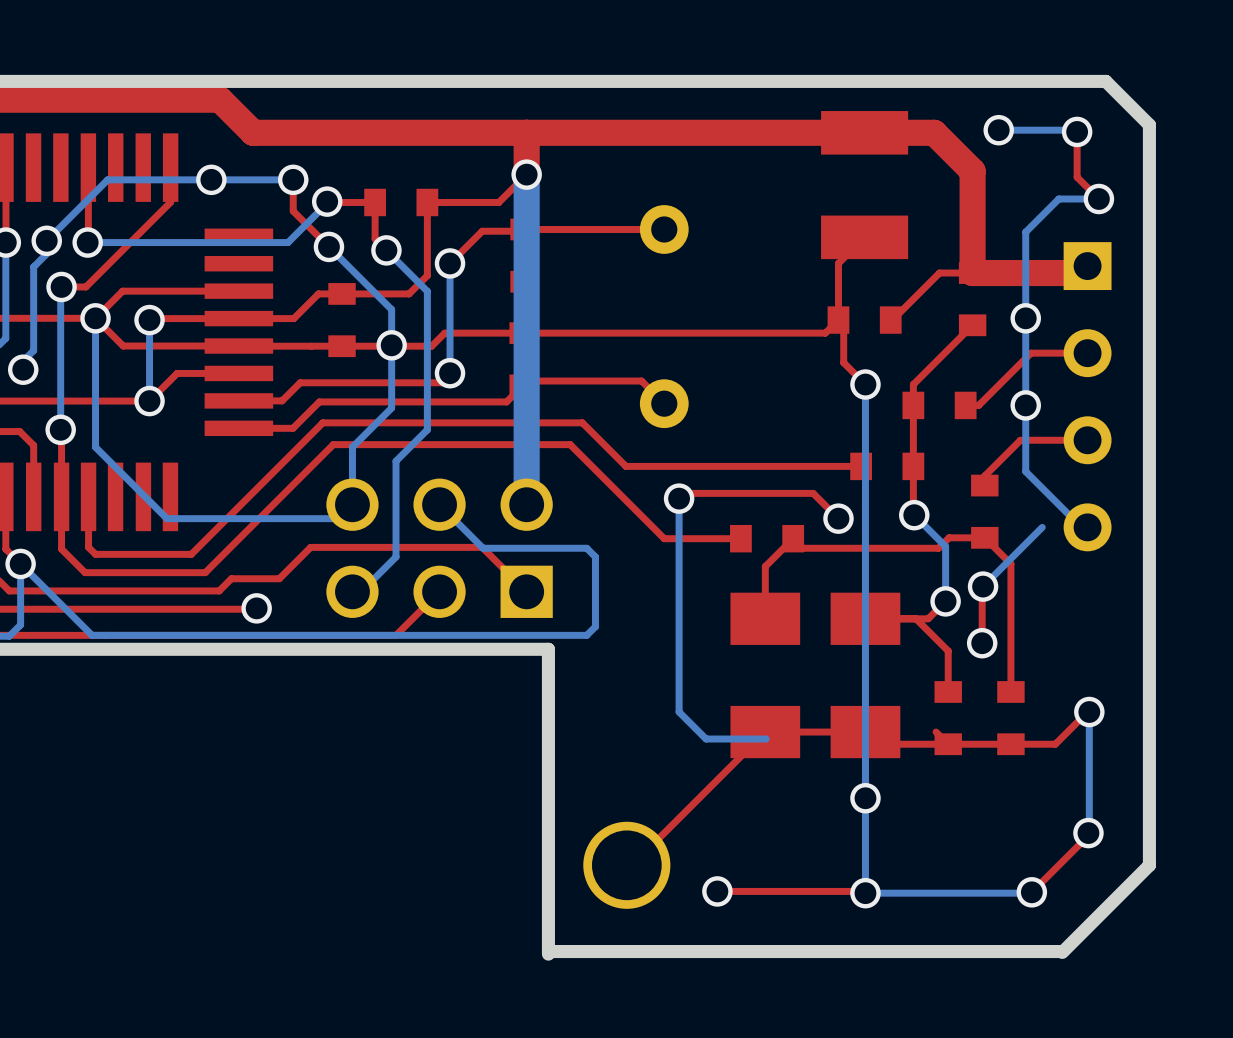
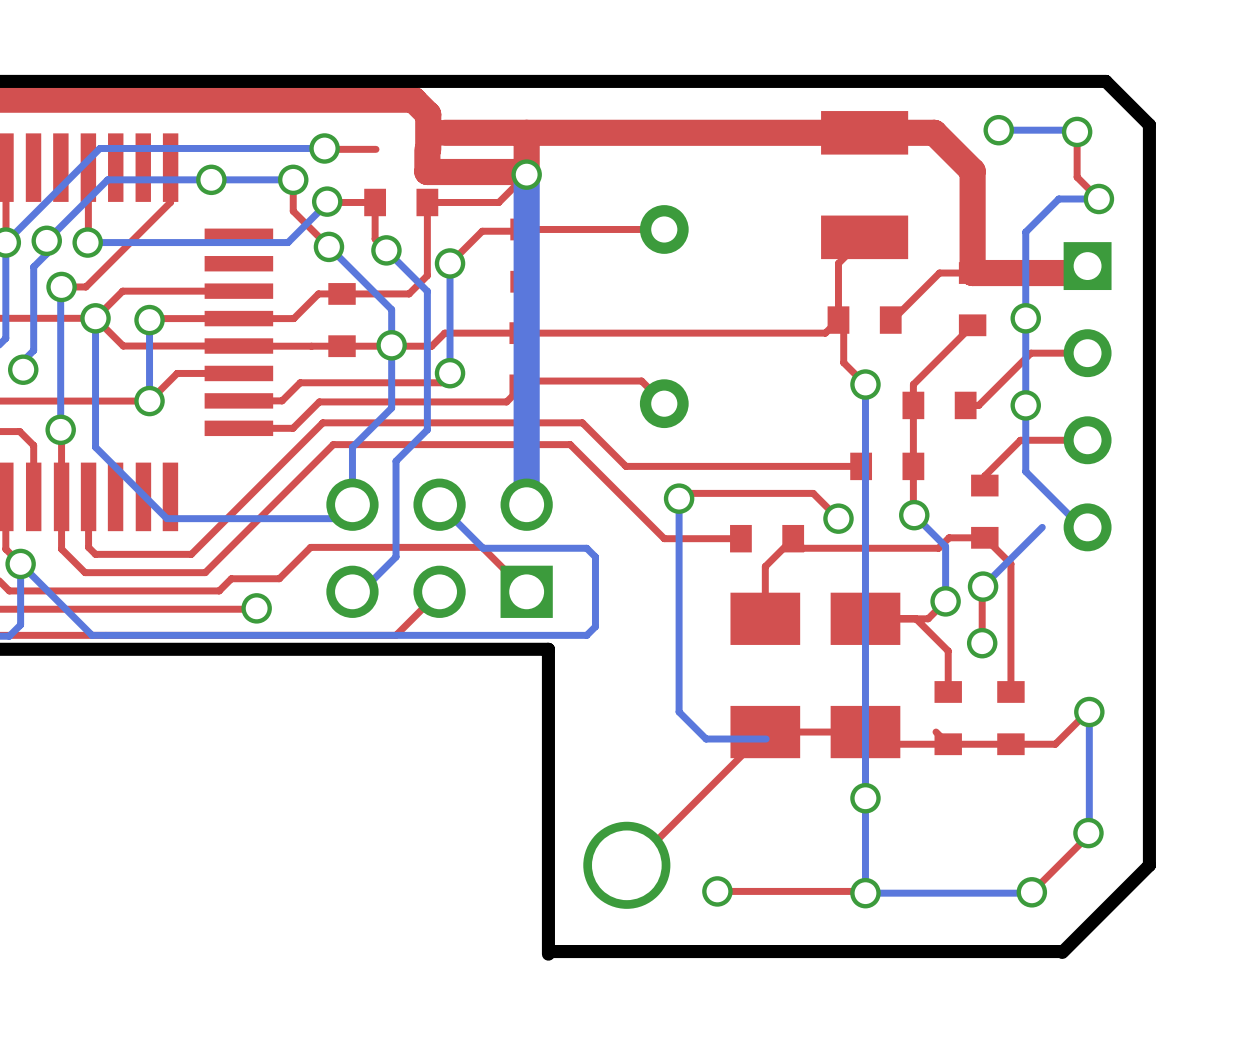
top track: (220, 99) (253, 132) (444, 132) -> (220, 99) (413, 99) (428, 114) (427, 172) (524, 172) (526, 174)
top track: none -> (324, 148) (375, 149)
bottom track: none -> (324, 148) (99, 148) (5, 242)
via: none -> (324, 148)

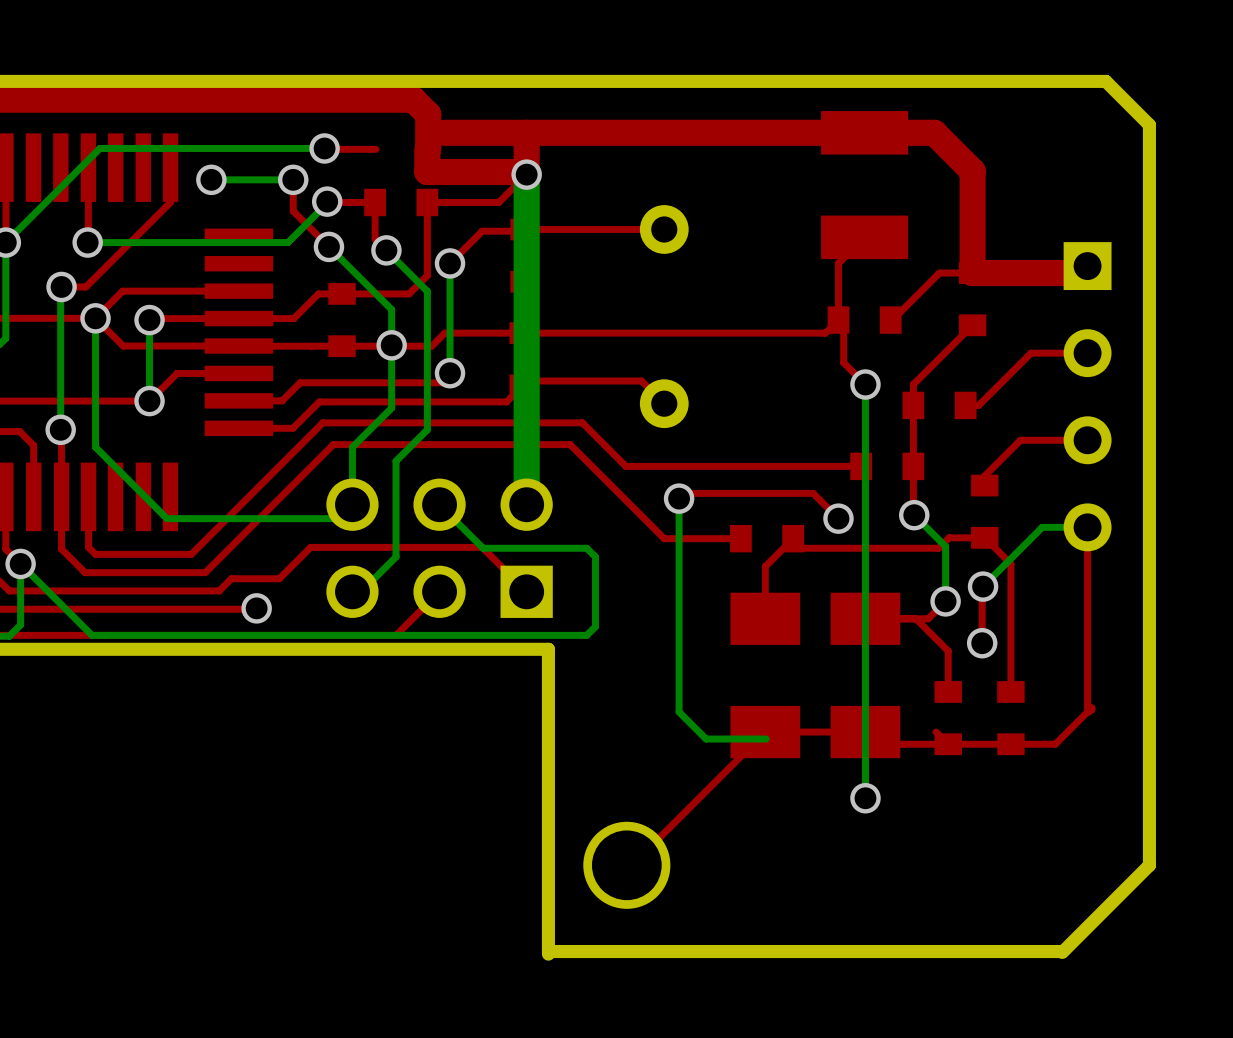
bottom track: (998, 130) (1075, 130) (1077, 131) -> none
via: (998, 130) -> none
top track: (1077, 131) (1077, 177) (1098, 199) -> none
via: (1077, 131) -> none
bottom track: (211, 179) (107, 179) (46, 240) (46, 253) (33, 266) (33, 350) (23, 361) (23, 369) -> none
bottom track: (1098, 199) (1058, 199) (1025, 232) (1025, 471) (1081, 527) -> (1042, 527) (1081, 527)
via: (1098, 199) -> none
via: (46, 240) -> none
via: (1025, 318) -> none
via: (23, 369) -> none
via: (1025, 405) -> none
top track: none -> (1087, 527) (1087, 712)
bottom track: (1089, 712) (1088, 833) -> none
via: (1089, 712) -> none
bottom track: (865, 798) (865, 893) (1031, 892) -> none
top track: (1088, 833) (1088, 835) (1031, 892) -> none
via: (1088, 833) -> none
top track: (717, 891) (863, 891) (865, 893) -> none
via: (717, 891) -> none
via: (1031, 892) -> none
via: (865, 893) -> none

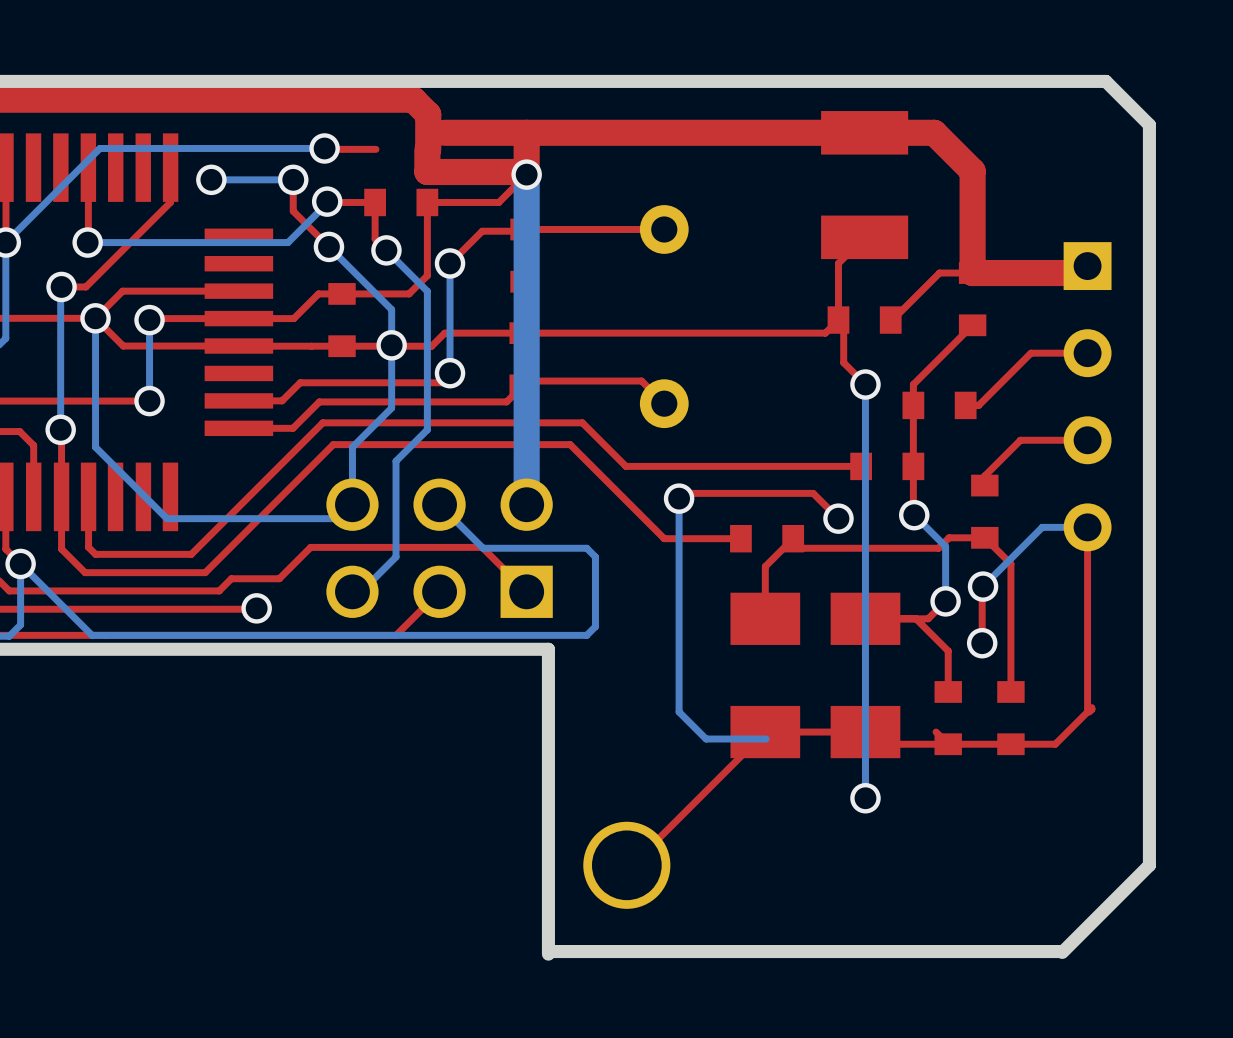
top track: (238, 373) (177, 373) (149, 401) -> none

